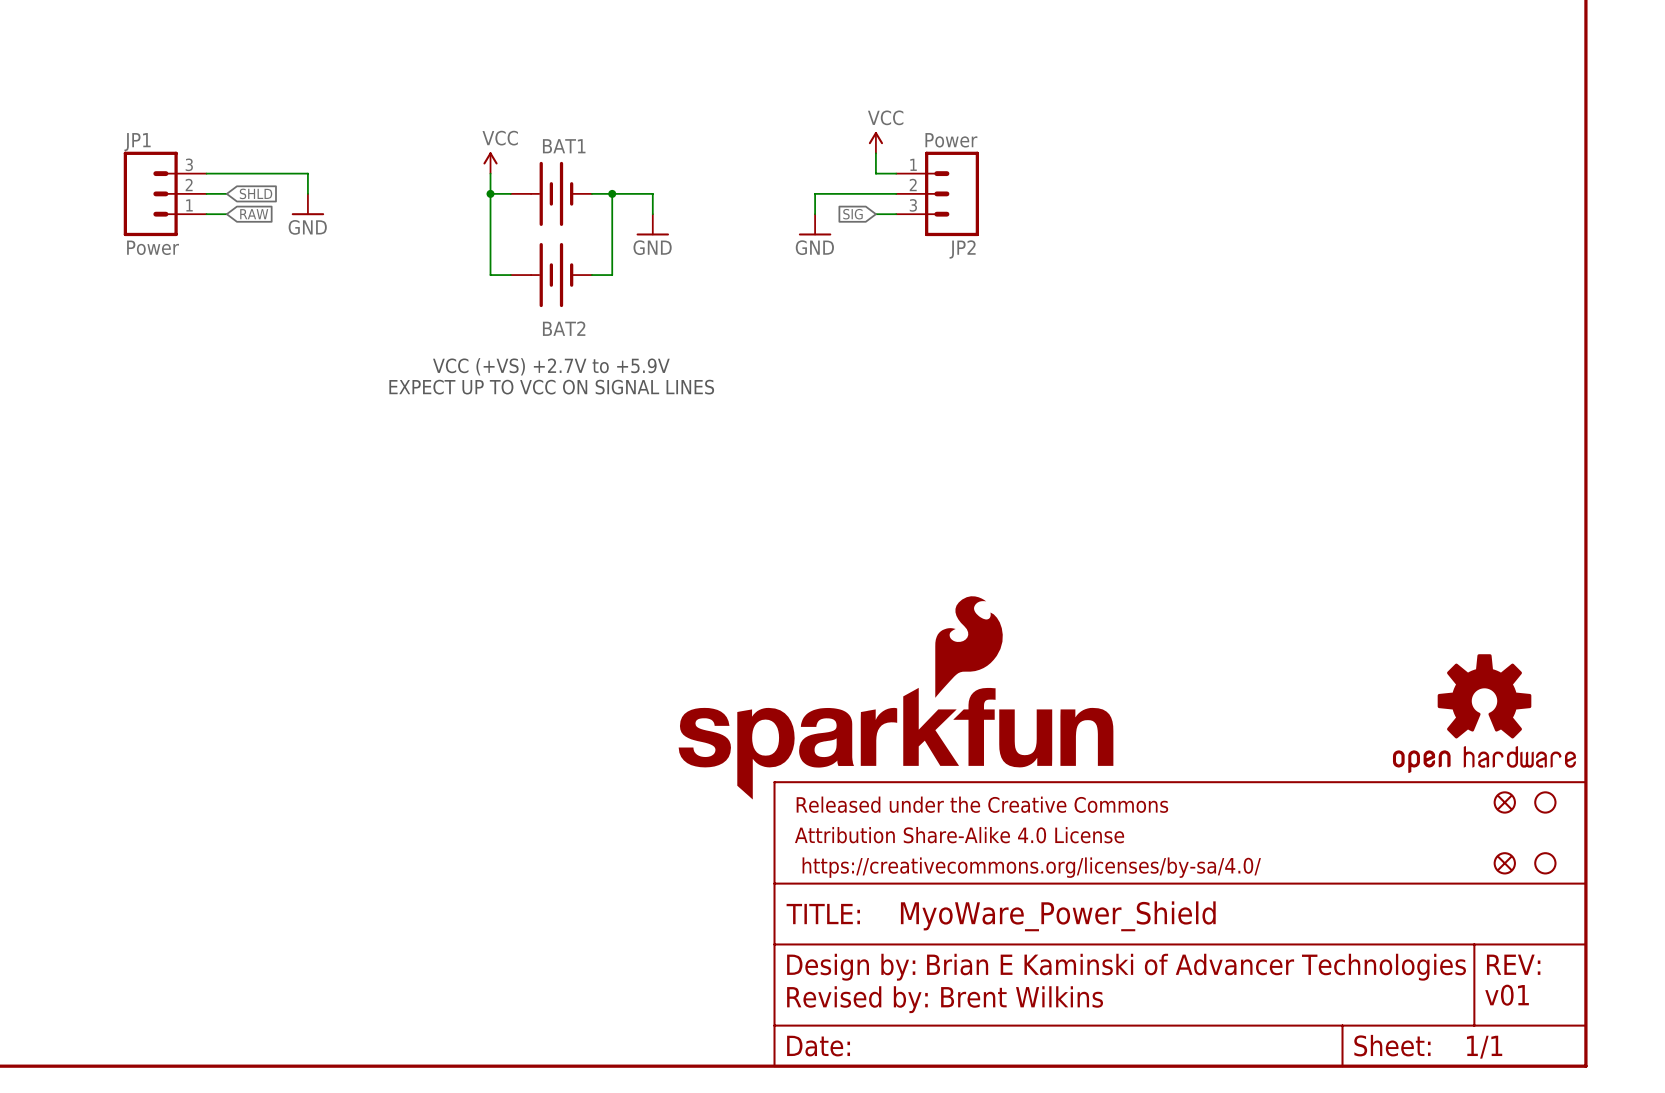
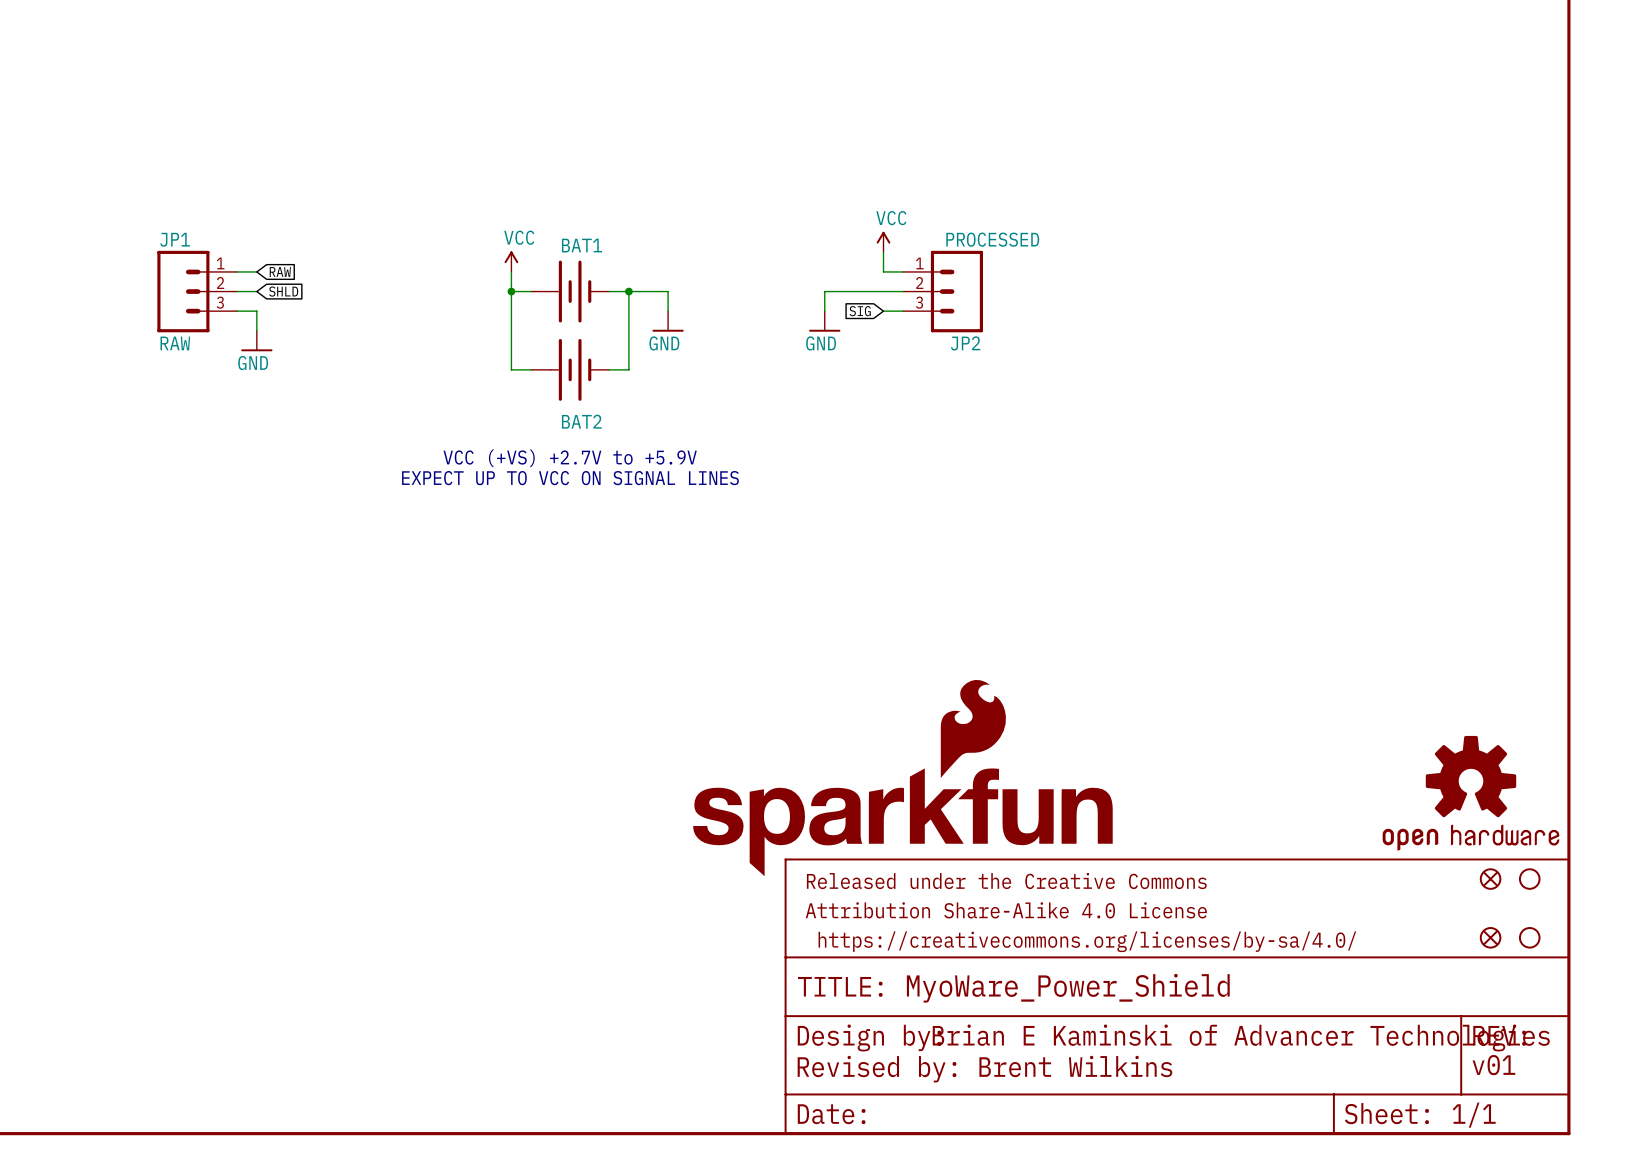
JP2 value: Power (951, 140) -> PROCESSED (992, 239)
wire: (226, 173) (307, 173) (307, 193) -> none
JP1 flip: as is (150, 193) -> up-down (183, 291)
power symbol position: GND (307, 204) -> GND (256, 341)
wire: none -> (256, 311) (256, 330)
global label position: RAW (254, 214) -> RAW (280, 271)
JP1 value: Power (153, 247) -> RAW (175, 343)

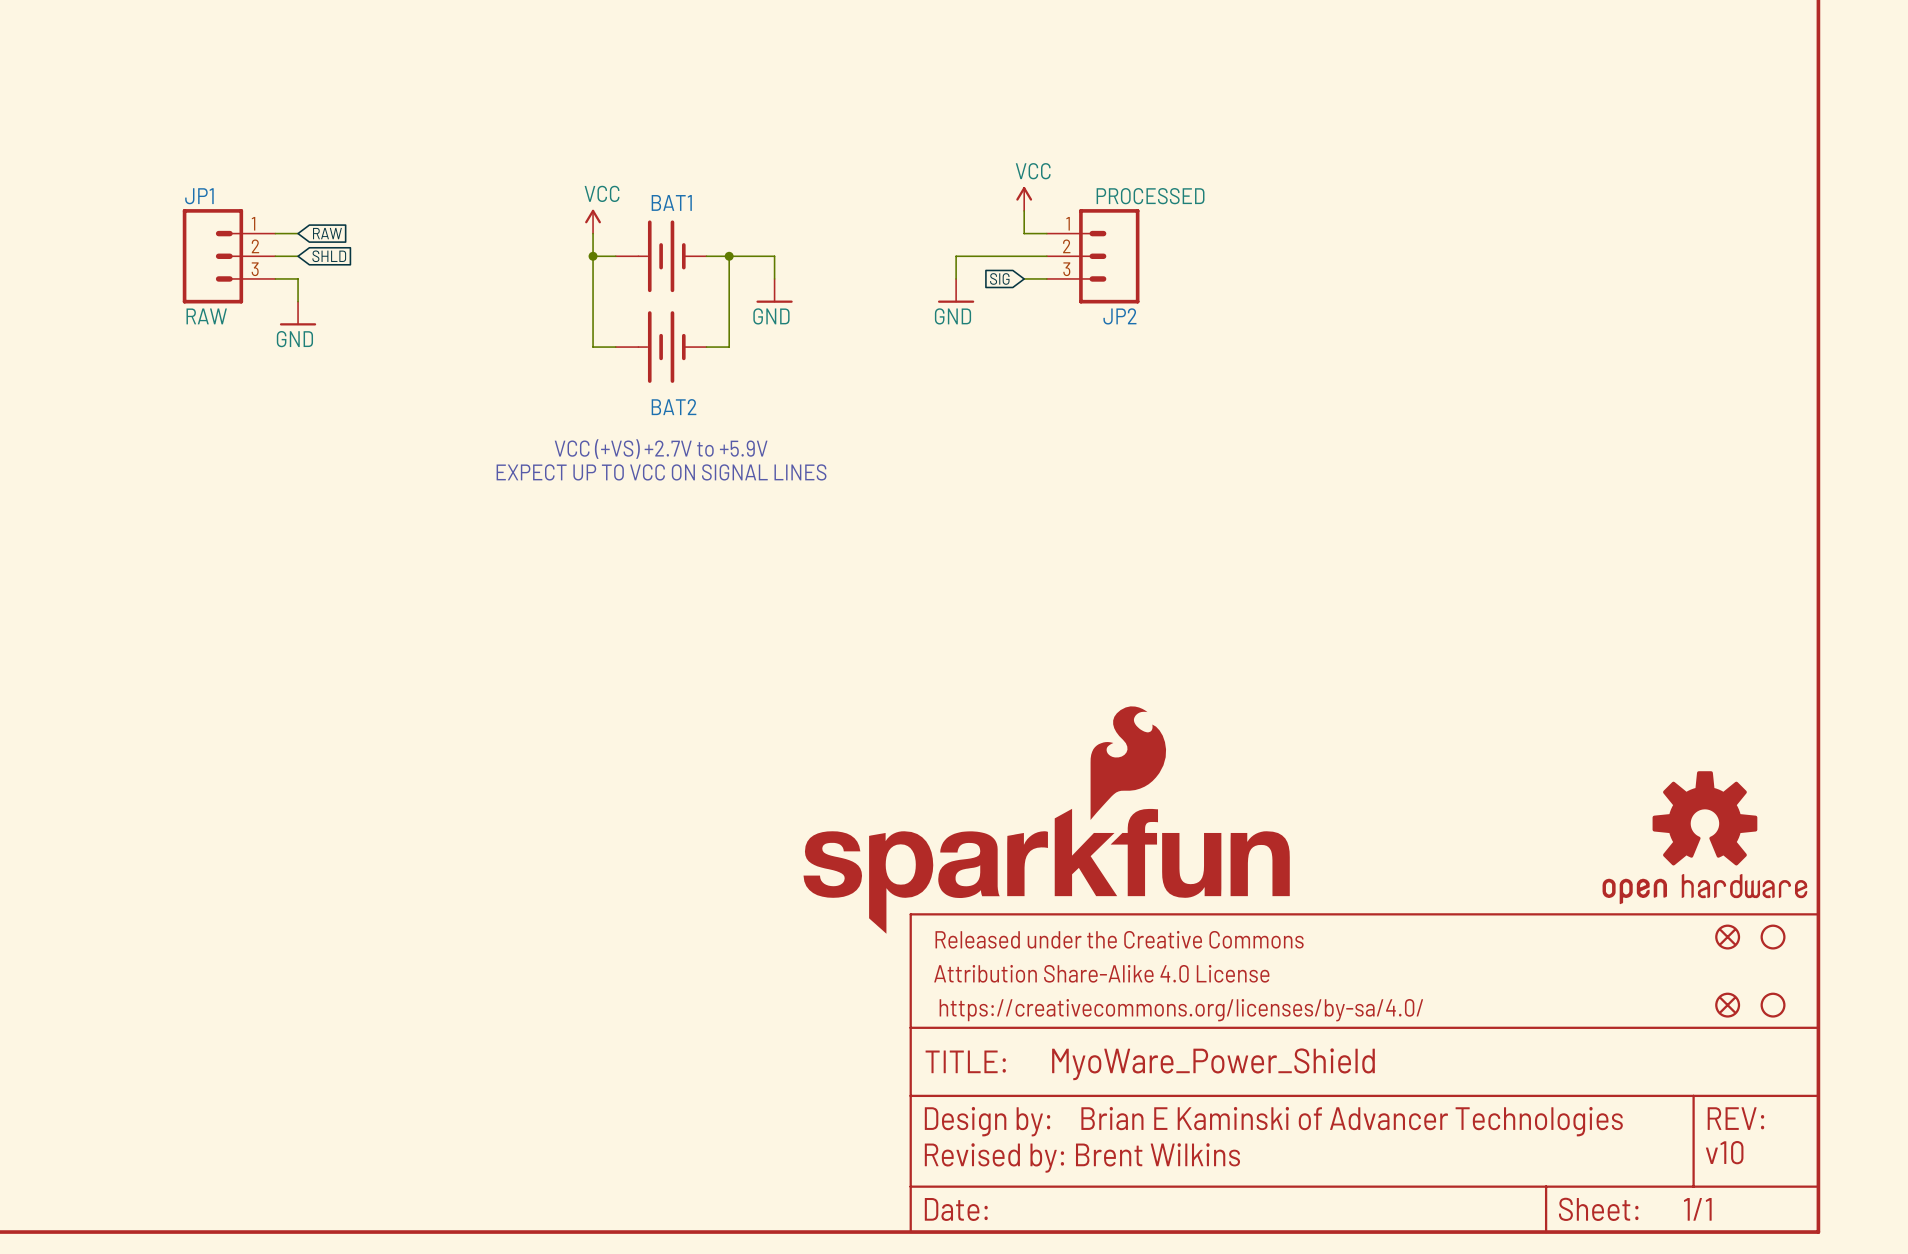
text: v01 (1493, 1065) -> v10 (1724, 1152)

